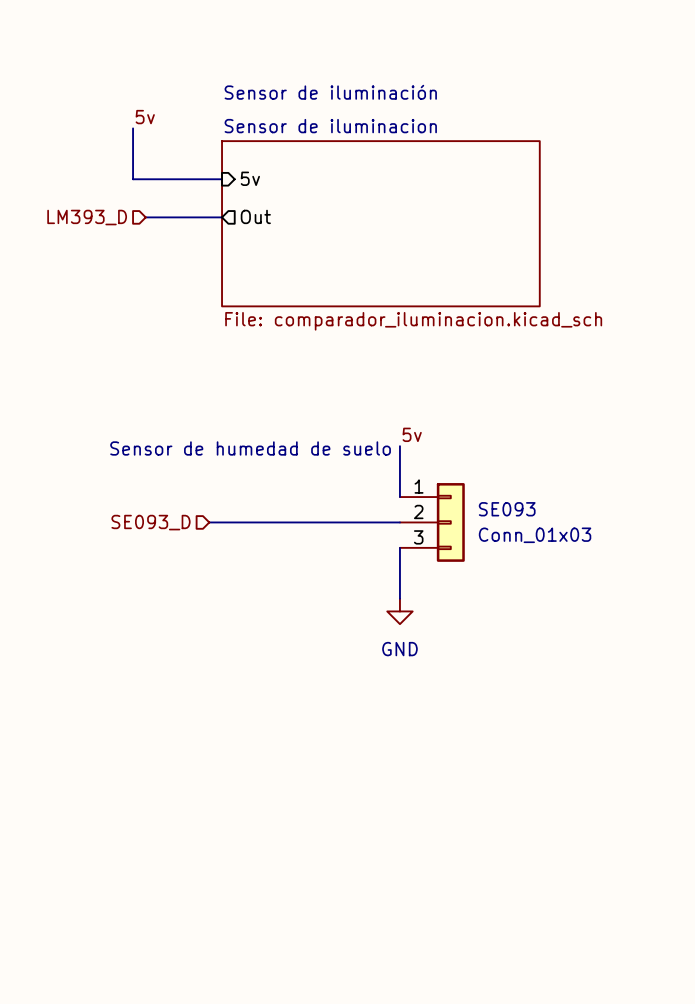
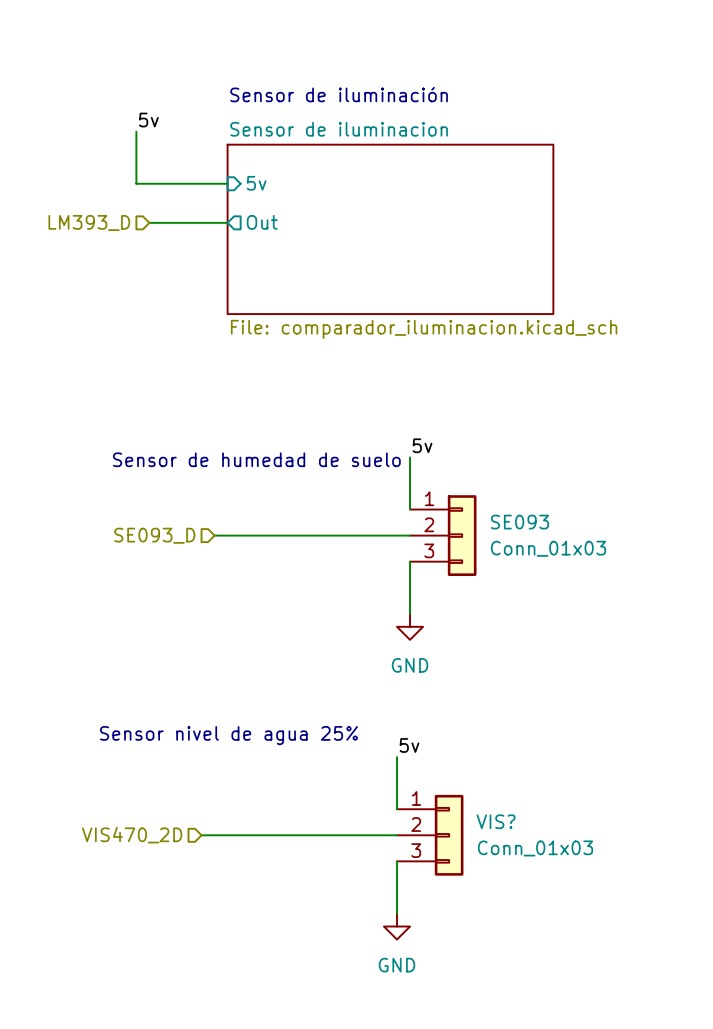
text: none -> Sensor nivel de agua 25% (228, 735)
label: none -> 5v (409, 745)
wire: none -> (397, 757) (397, 809)
hierarchical label: none -> VIS470_2D (132, 835)
wire: none -> (201, 835) (397, 835)
VIS?: none -> Conn_01x03 (430, 835)
wire: none -> (397, 861) (397, 913)
power symbol: none -> GND (397, 926)

